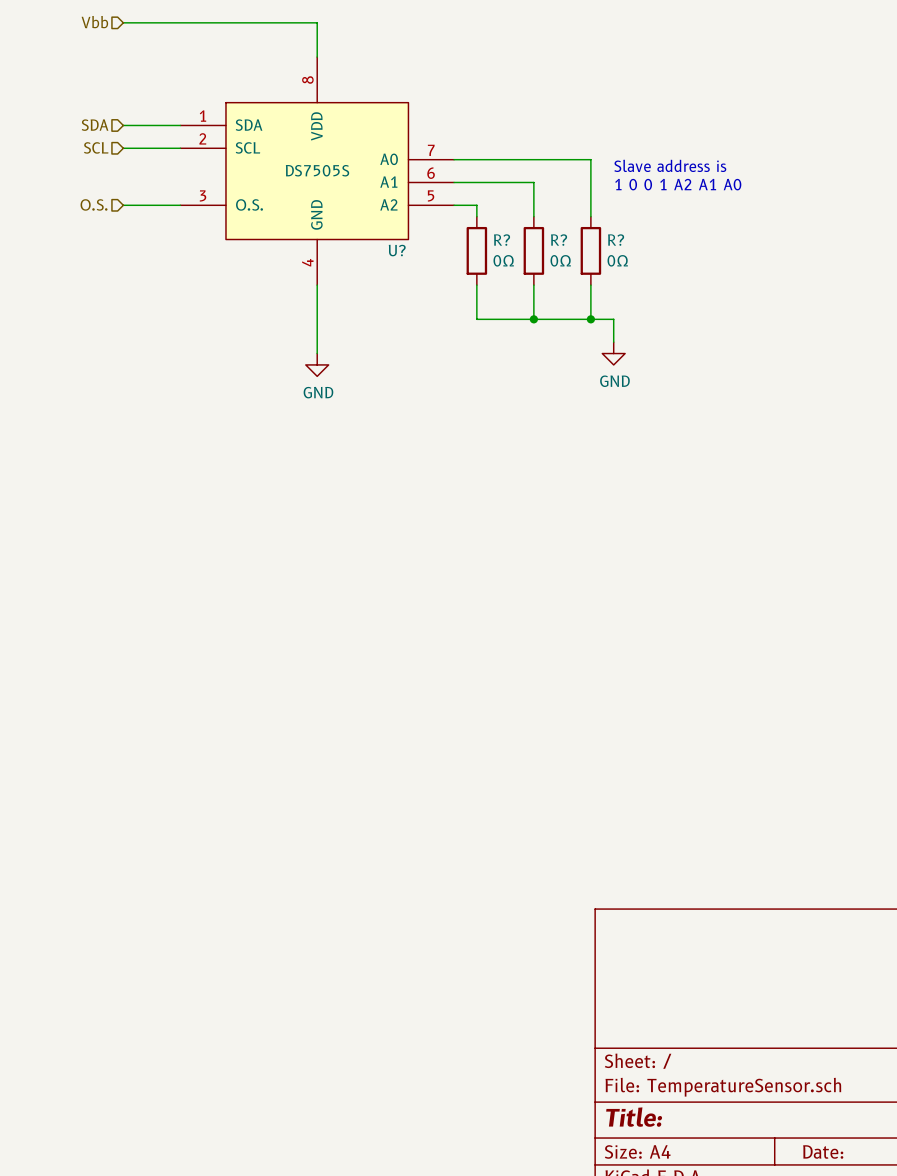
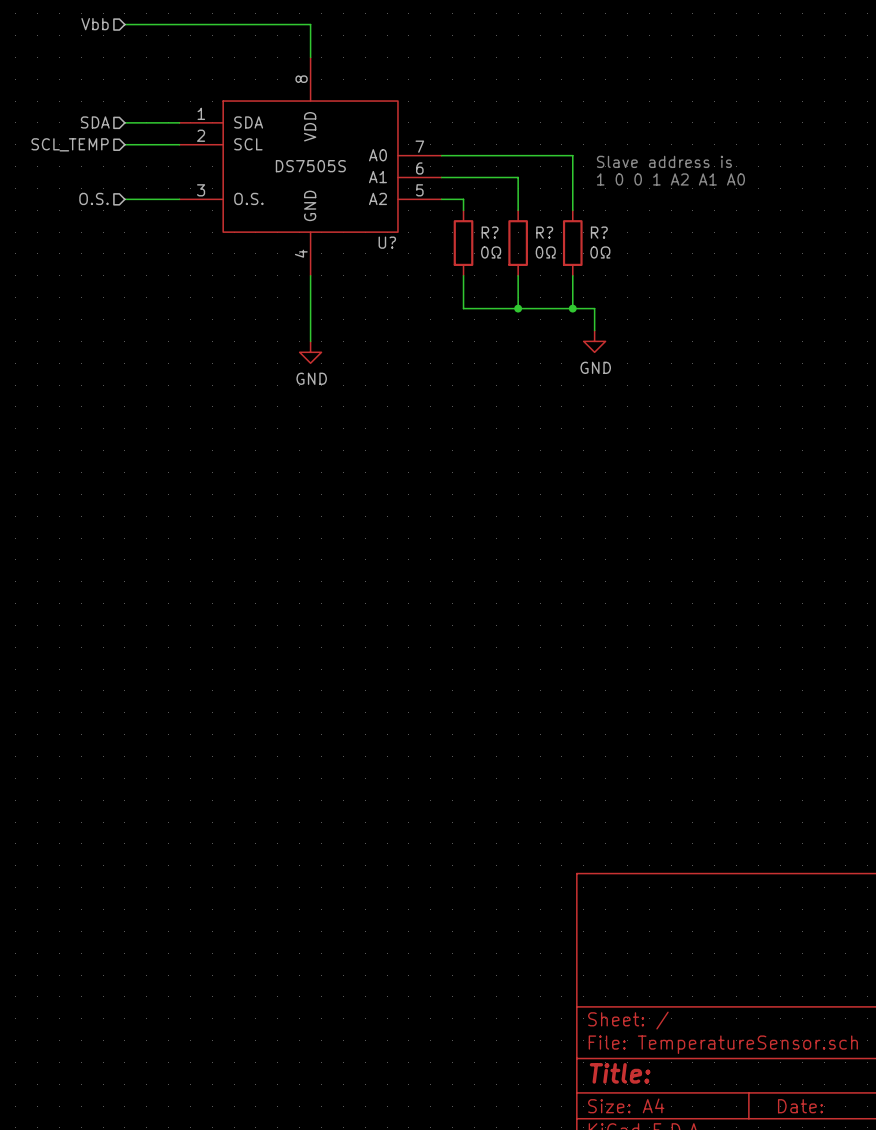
hierarchical label: SCL (96, 147) -> SCL_TEMP (70, 144)

